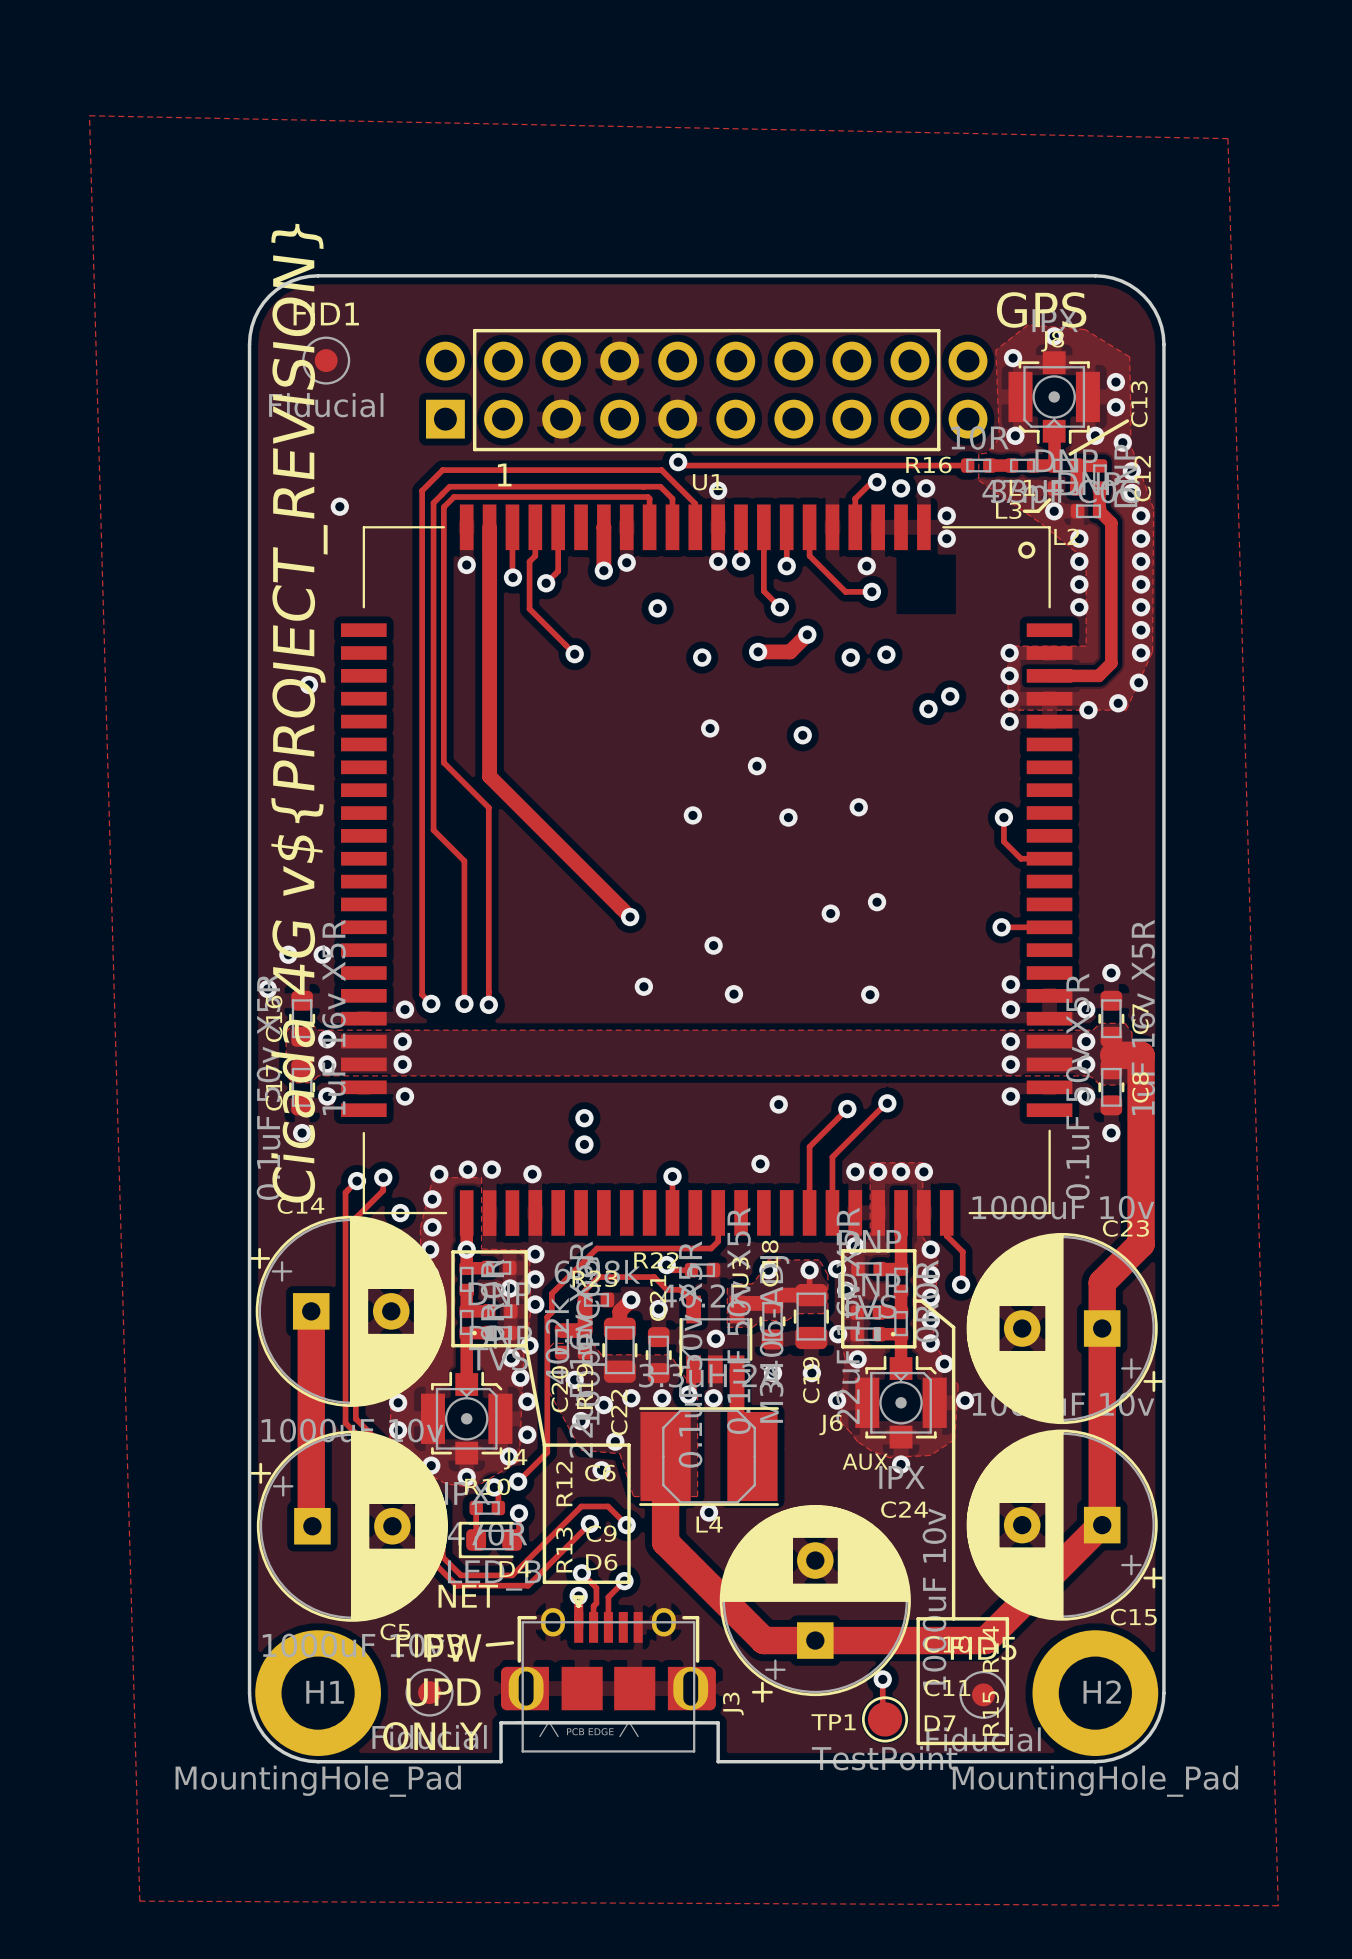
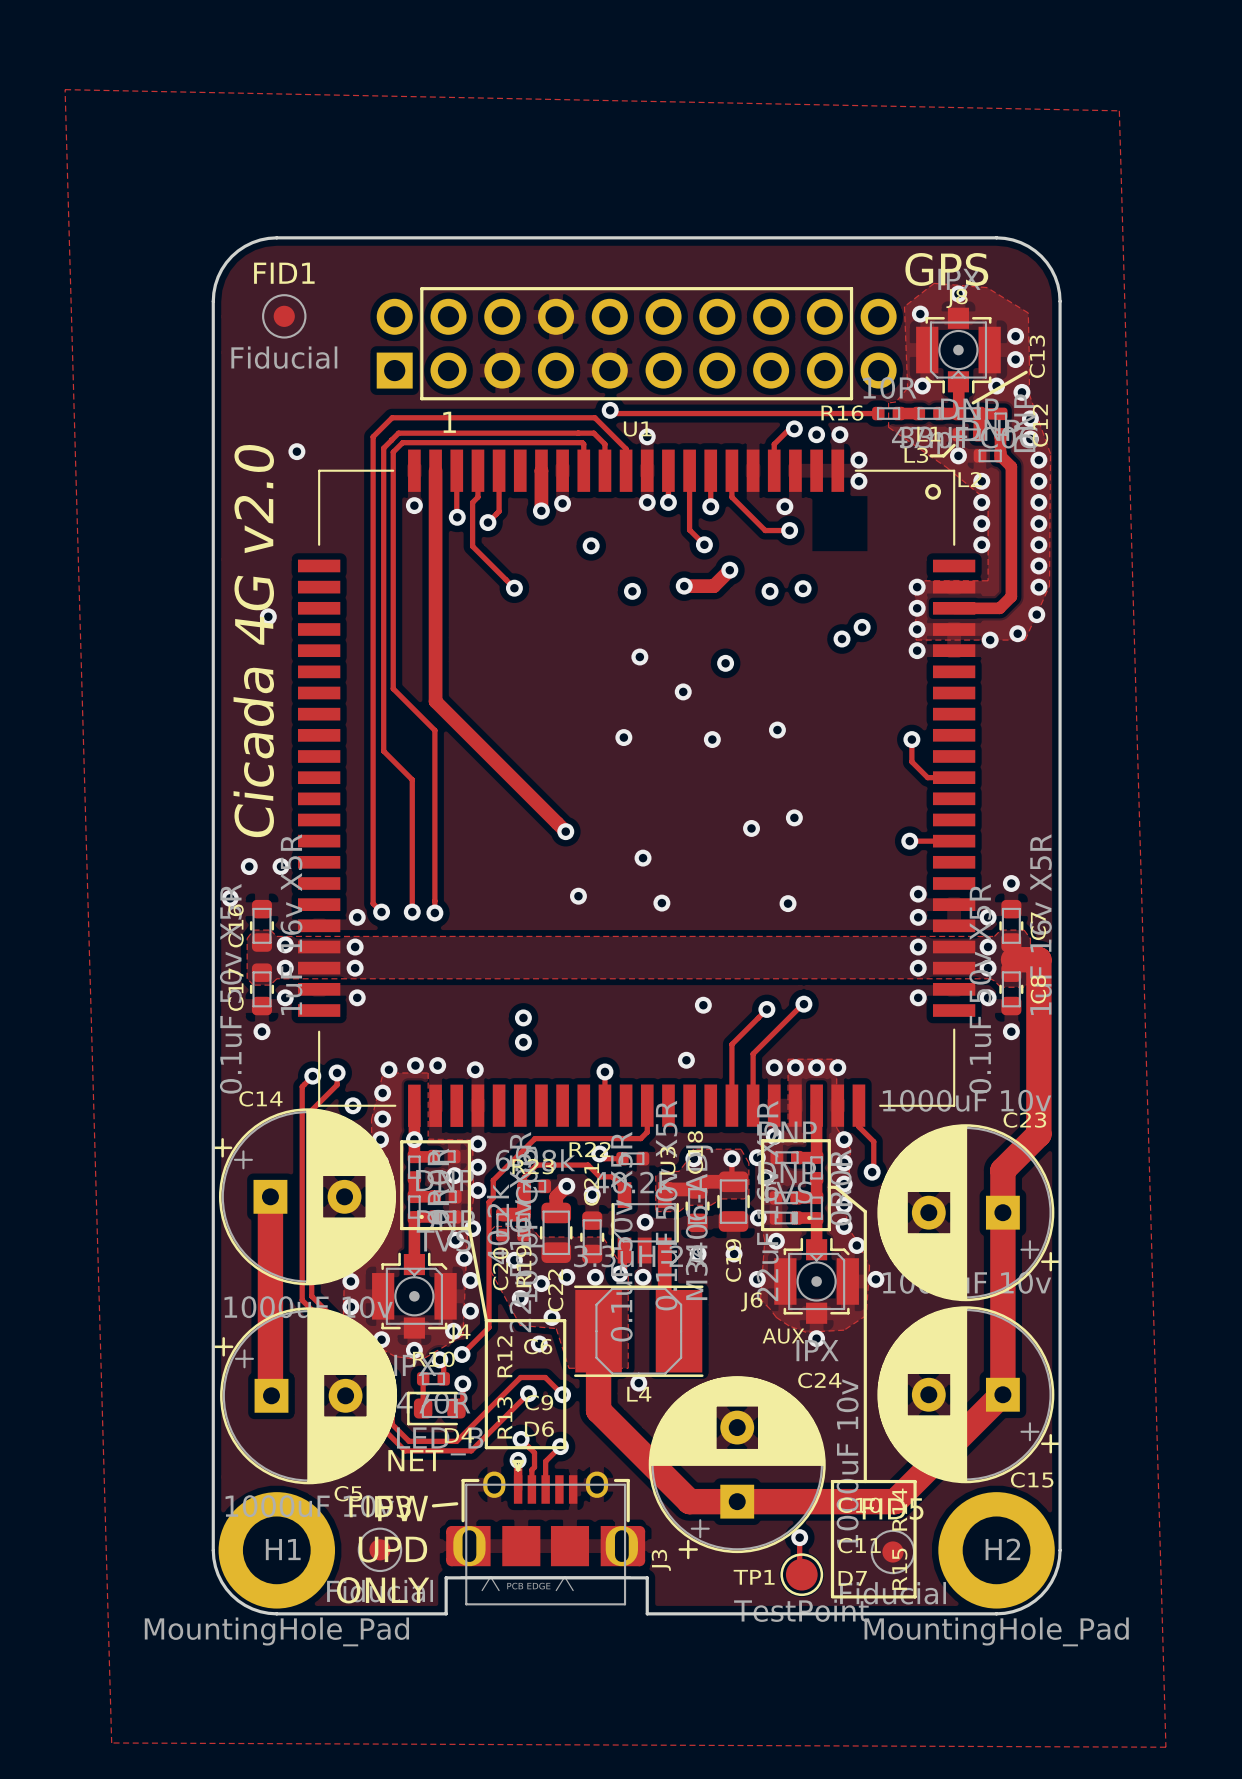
text: Cicada 4G v${PROJECT_REVISION} (299, 713) -> Cicada 4G v2.0 (253, 641)

